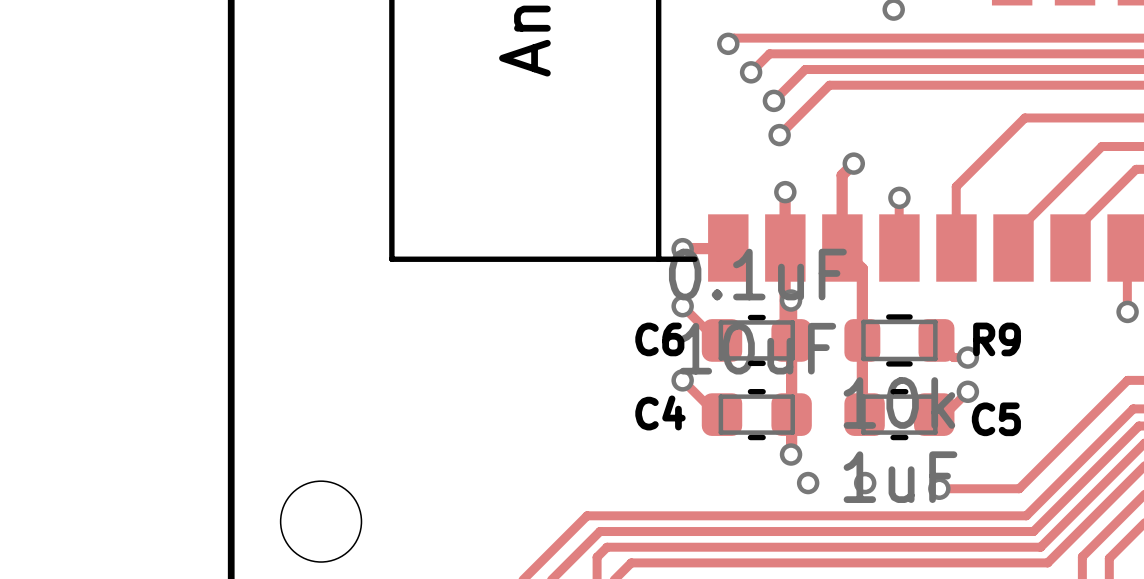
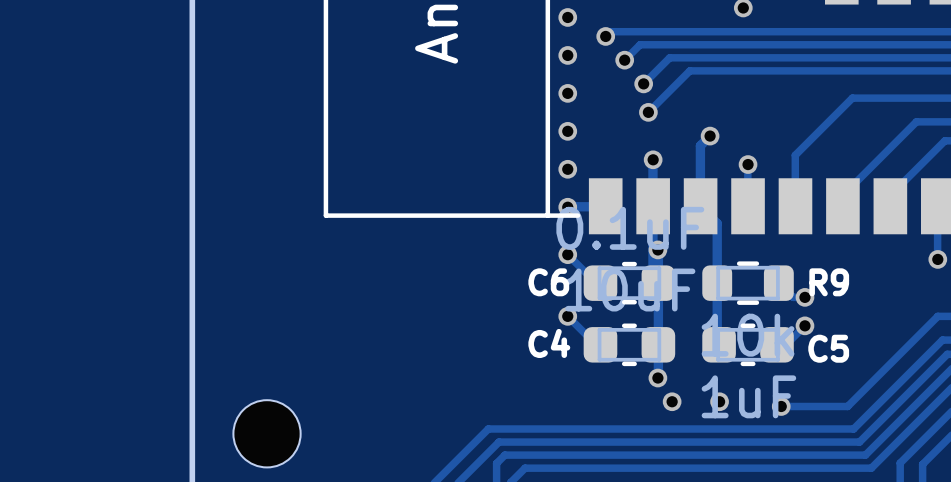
via: none -> (567, 17)
via: none -> (567, 55)
via: none -> (567, 93)
via: none -> (567, 131)
via: none -> (567, 169)

